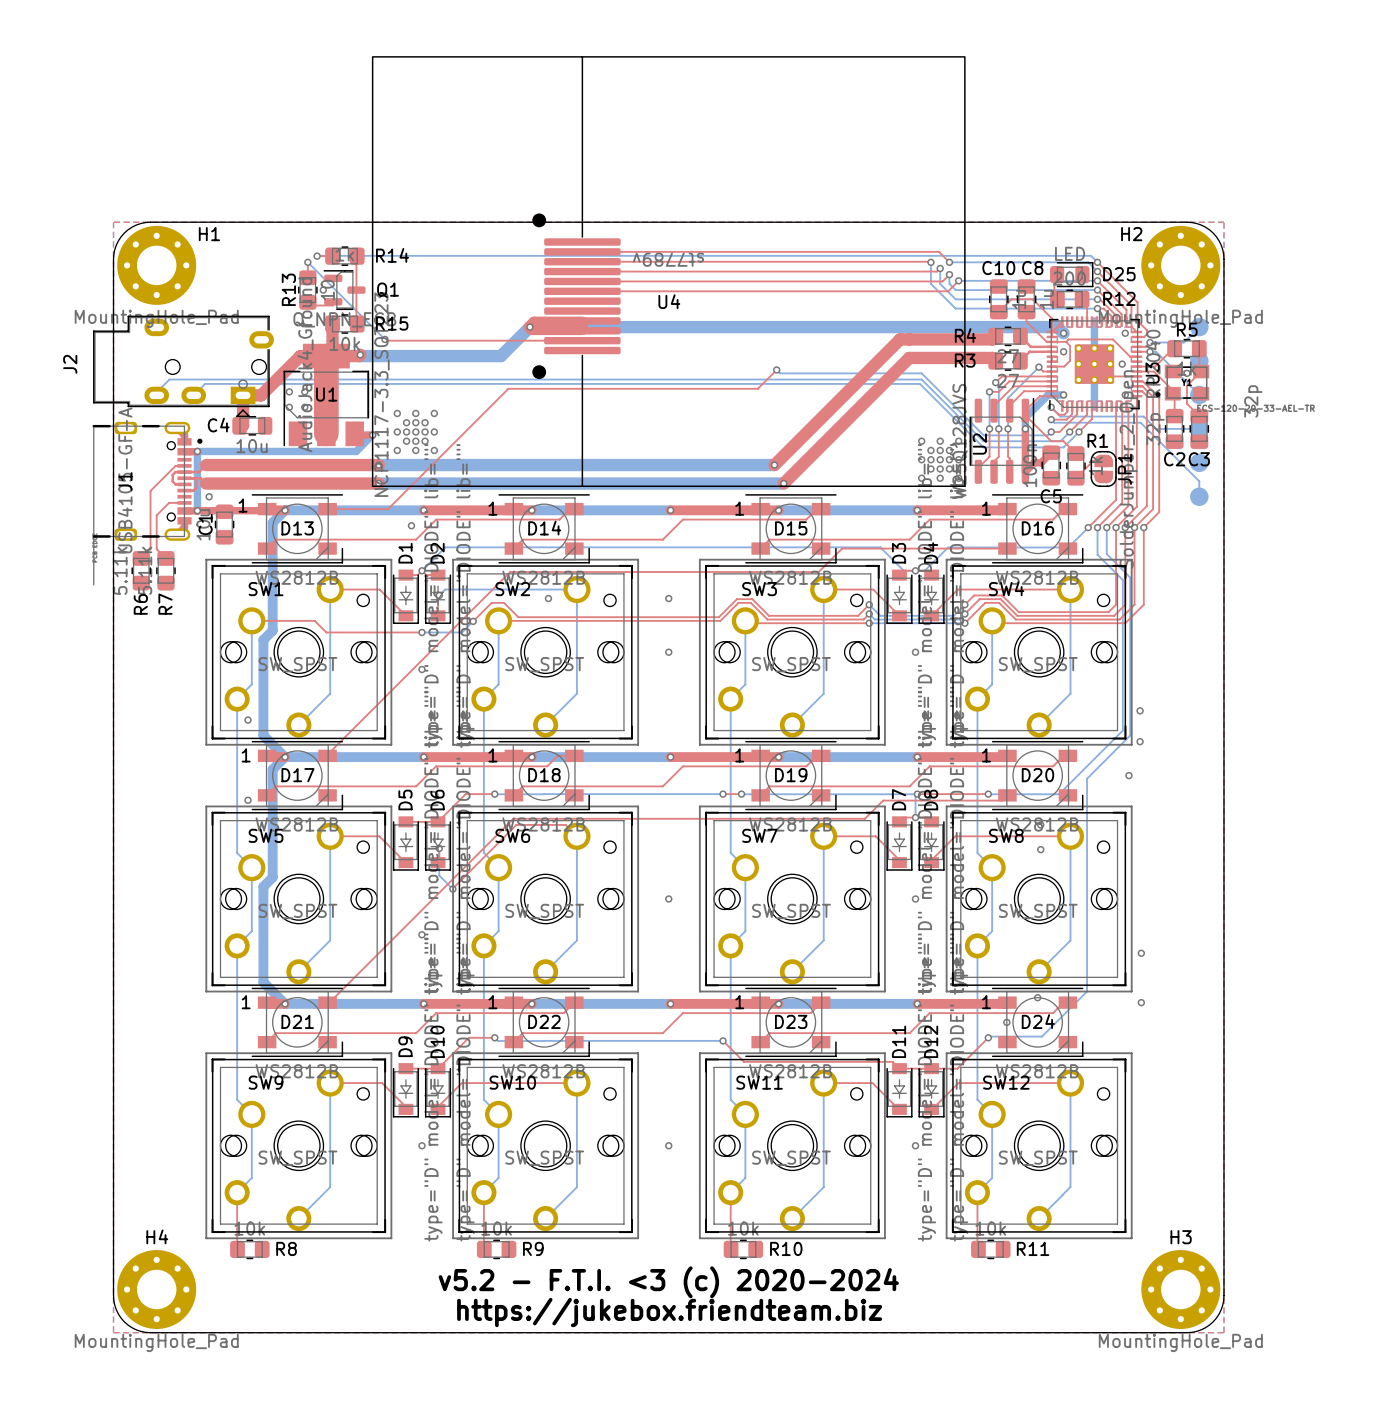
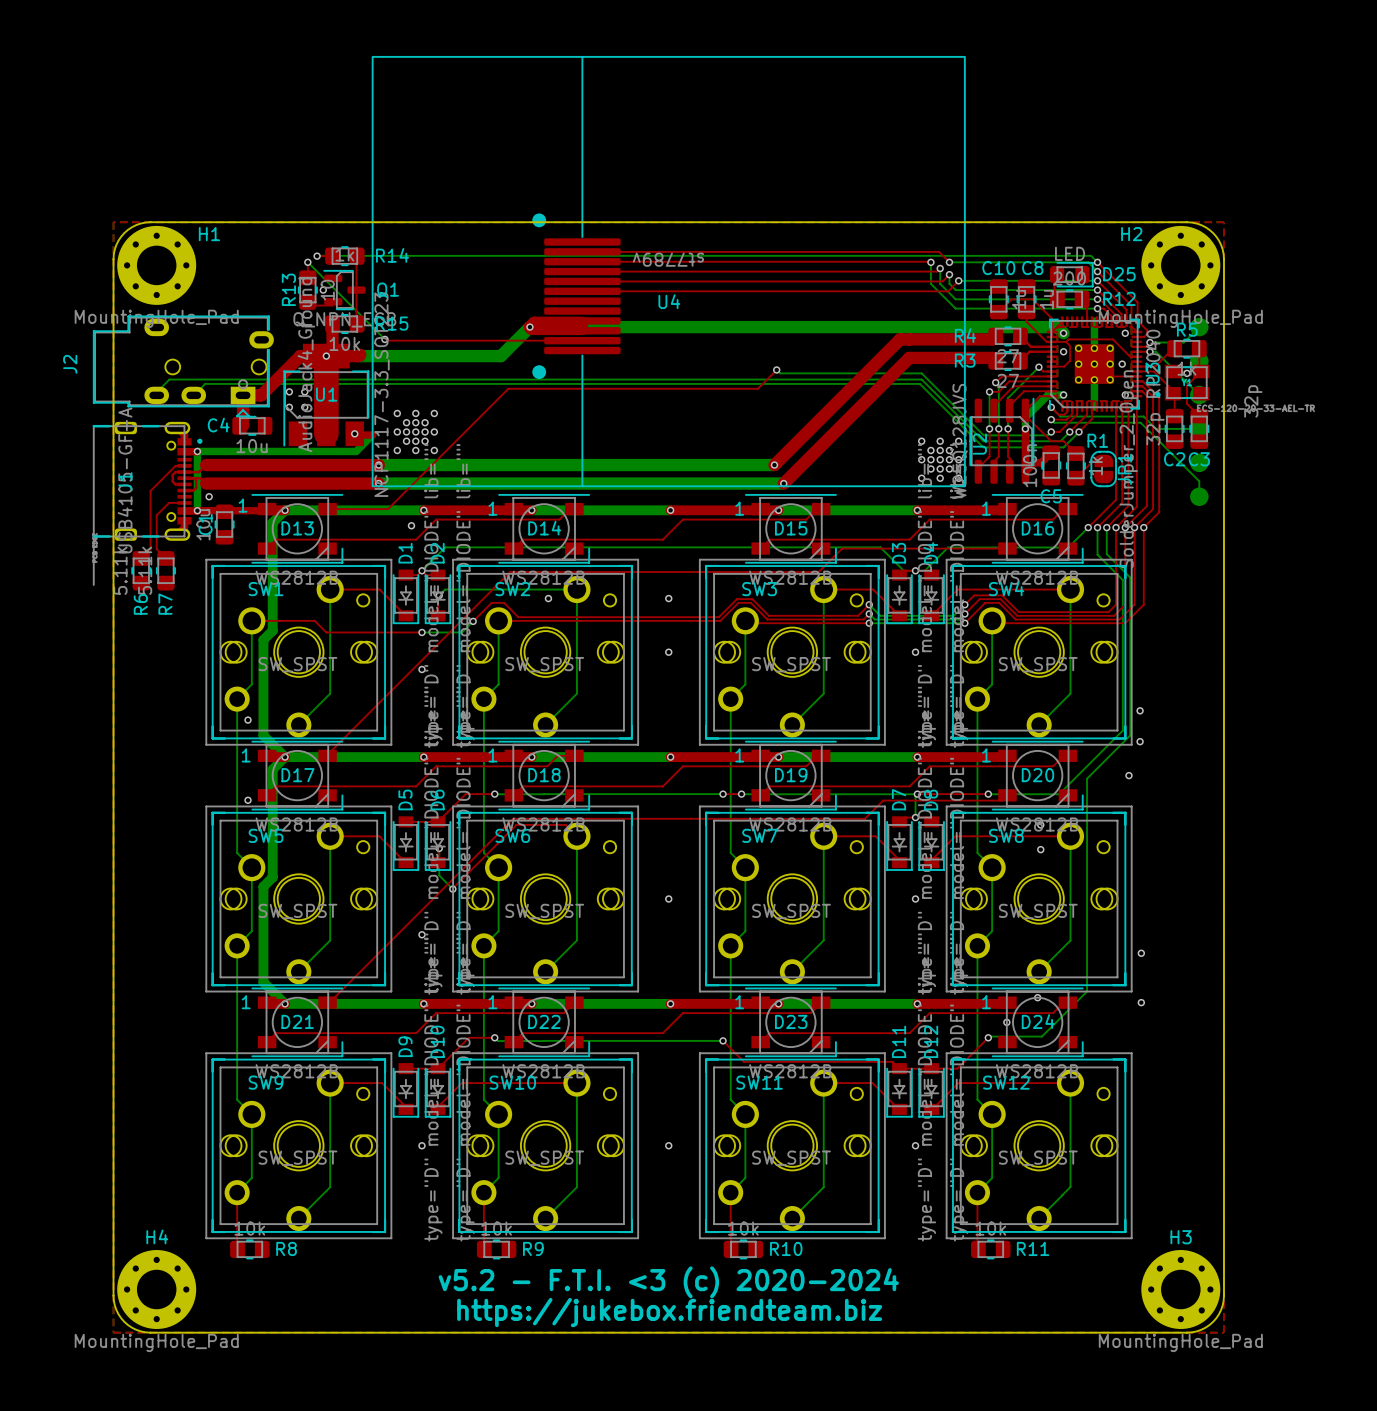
via position: (360, 354) -> (326, 356)
via position: (372, 435) -> (354, 433)

